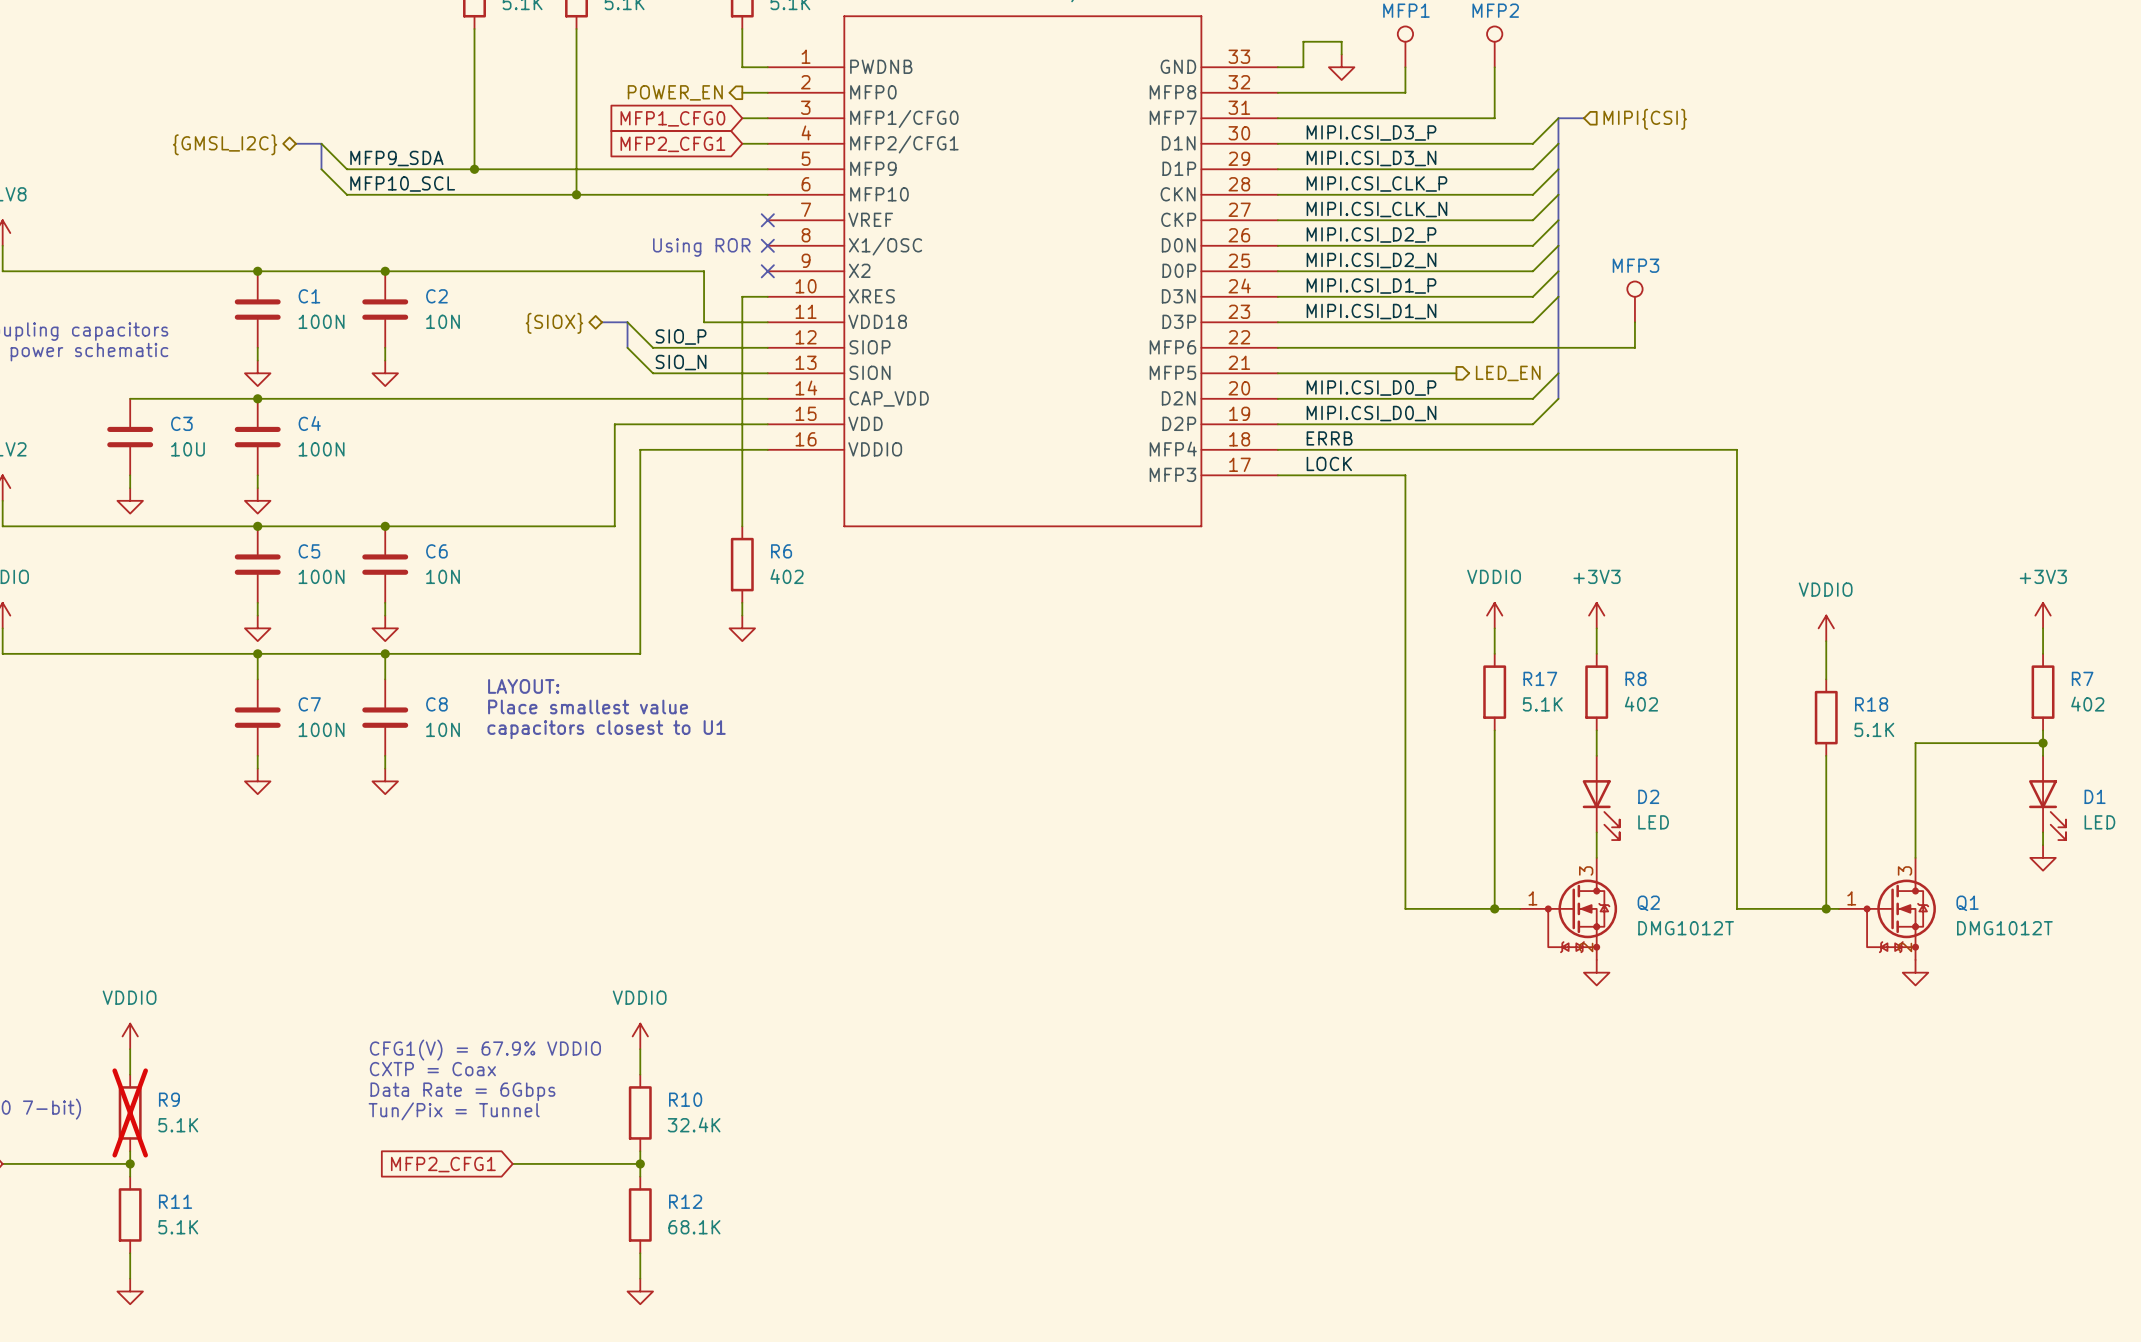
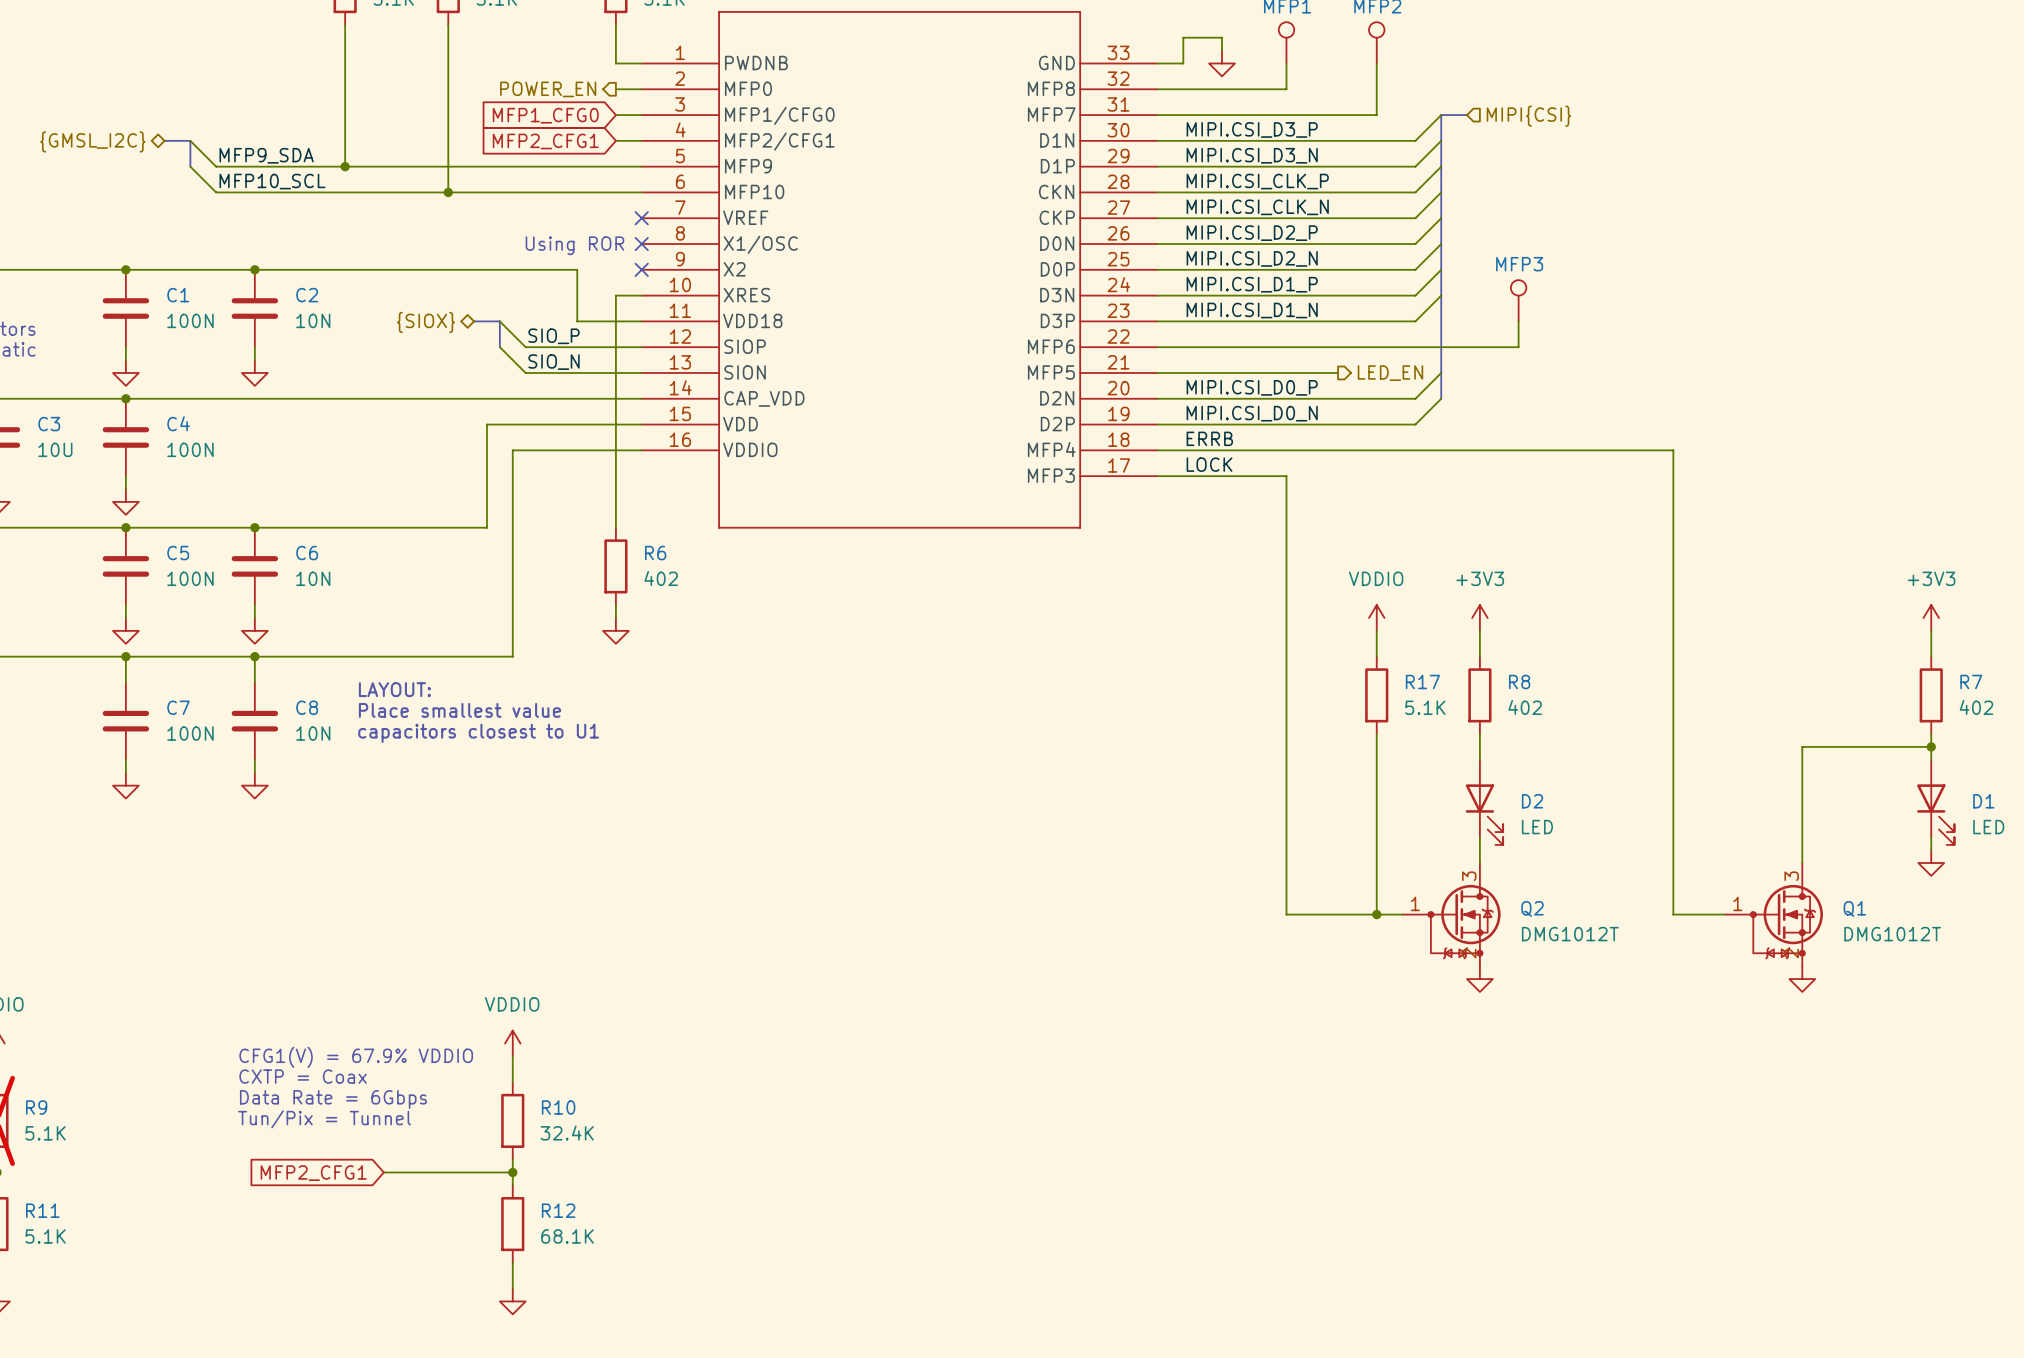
wire: (1736, 449) (1736, 908) (1787, 908) -> (1621, 450) (1673, 450) (1673, 914)
power symbol: VDDIO (1826, 628) -> none
wire: (1826, 641) (1826, 679) -> none
R18: 5.1K (1826, 717) -> none
wire: (1826, 755) (1826, 908) -> none
junction: (1826, 908) -> none

